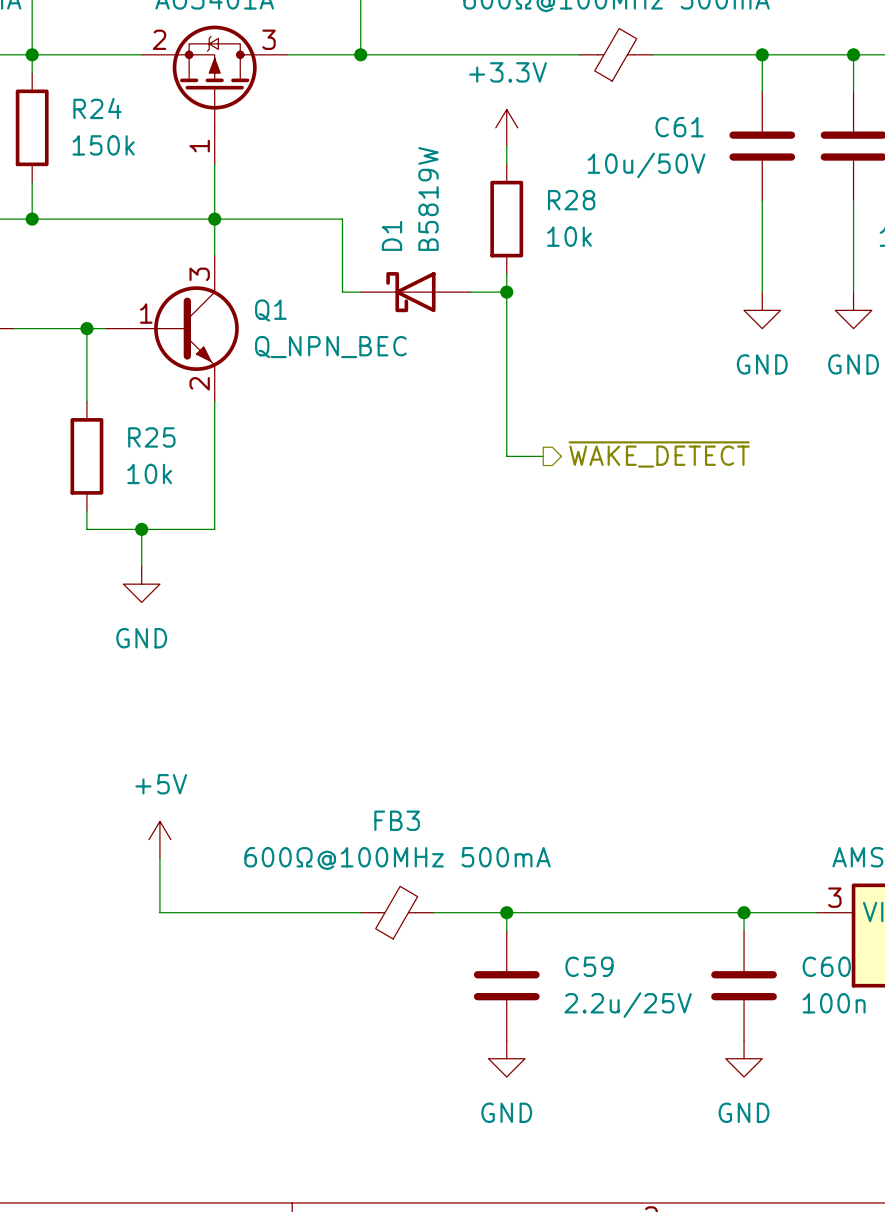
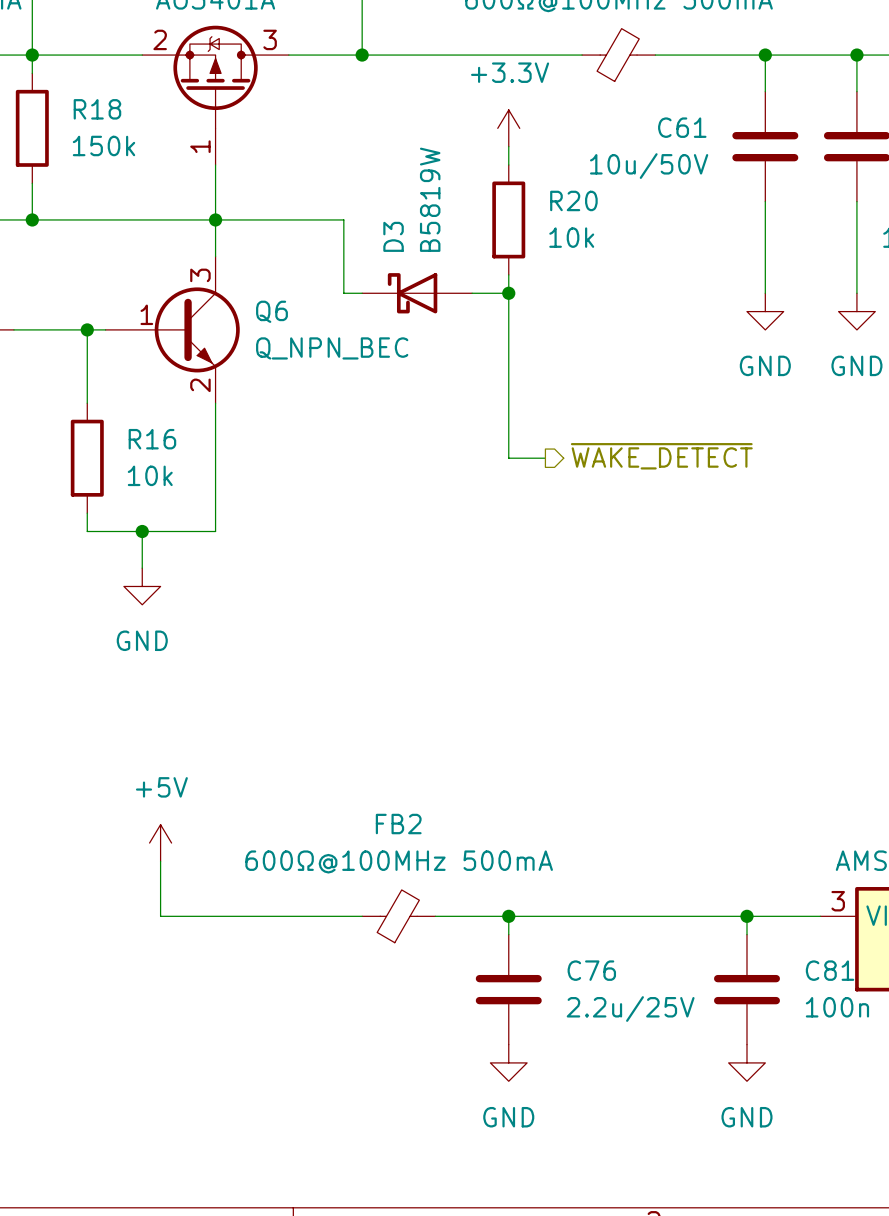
R24 name: R24 (97, 108) -> R18 (97, 109)
R28 name: R28 (571, 200) -> R20 (573, 200)
D1 name: D1 (391, 235) -> D3 (393, 236)
Q1 name: Q1 (270, 310) -> Q6 (271, 311)
R25 name: R25 (151, 437) -> R16 (152, 439)
FB3 name: FB3 (397, 820) -> FB2 (398, 824)
C59 name: C59 (589, 966) -> C76 (591, 970)
C60 name: C60 (826, 966) -> C81 (830, 970)

